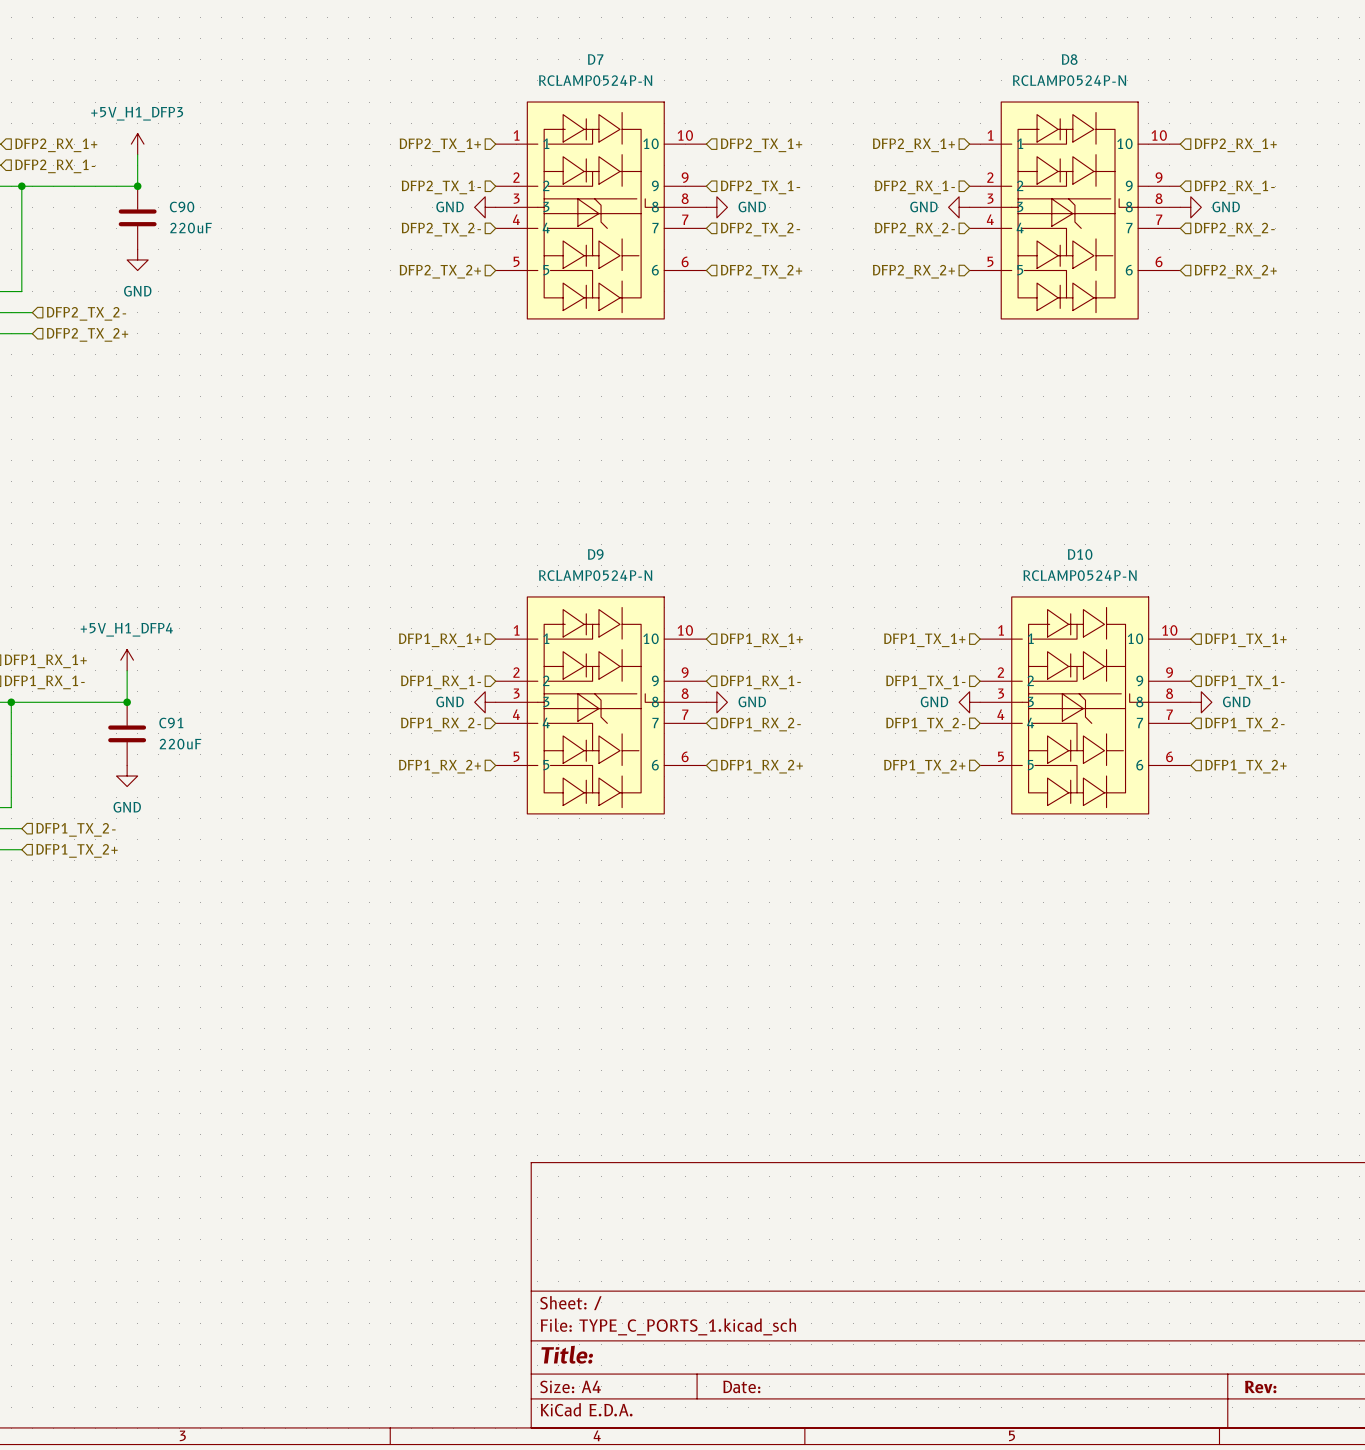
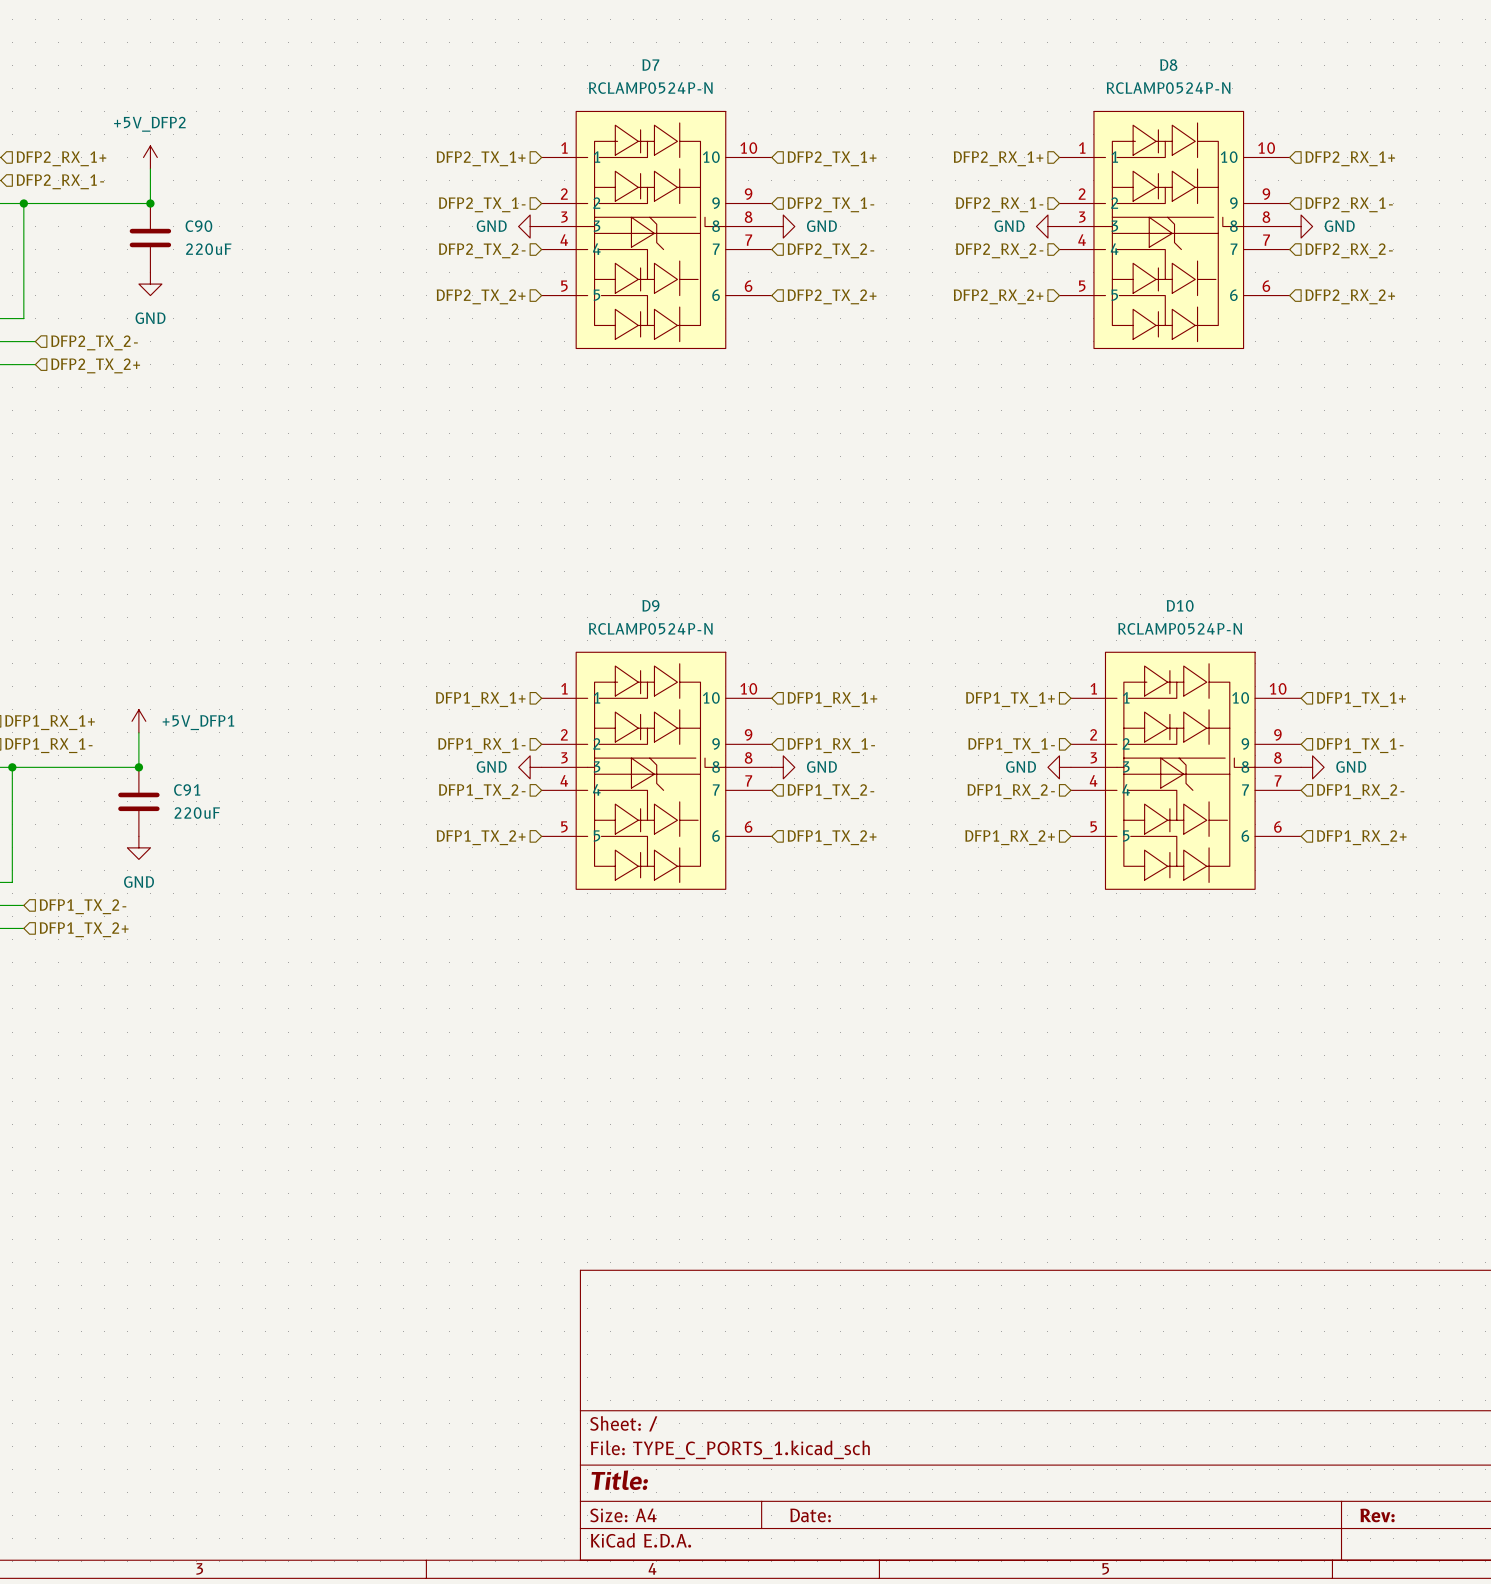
power symbol: +5V_H1_DFP3 (137, 144) -> +5V_DFP2 (150, 157)
power symbol: +5V_H1_DFP4 (127, 660) -> +5V_DFP1 (138, 721)
hierarchical label: DFP1_RX_2- (441, 724) -> DFP1_TX_2- (482, 791)
hierarchical label: DFP1_RX_2- (760, 724) -> DFP1_TX_2- (830, 791)
hierarchical label: DFP1_TX_2- (925, 724) -> DFP1_RX_2- (1011, 791)
hierarchical label: DFP1_TX_2- (1244, 724) -> DFP1_RX_2- (1360, 791)
hierarchical label: DFP1_RX_2+ (439, 766) -> DFP1_TX_2+ (481, 837)
hierarchical label: DFP1_RX_2+ (761, 766) -> DFP1_TX_2+ (832, 837)
hierarchical label: DFP1_TX_2+ (924, 766) -> DFP1_RX_2+ (1010, 837)
hierarchical label: DFP1_TX_2+ (1245, 766) -> DFP1_RX_2+ (1361, 837)

